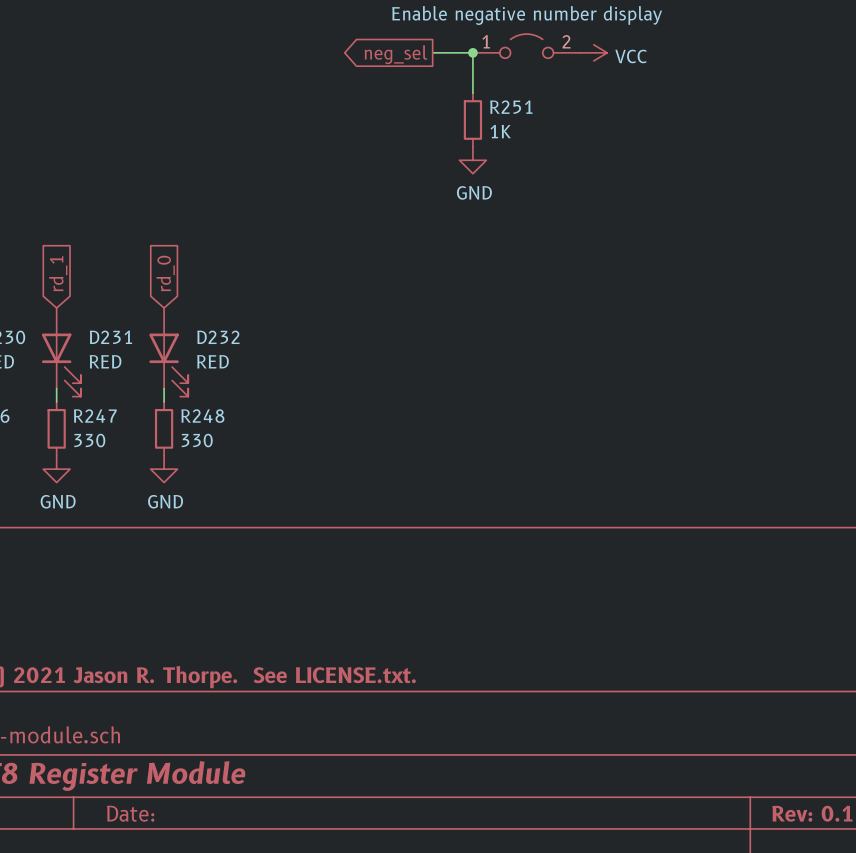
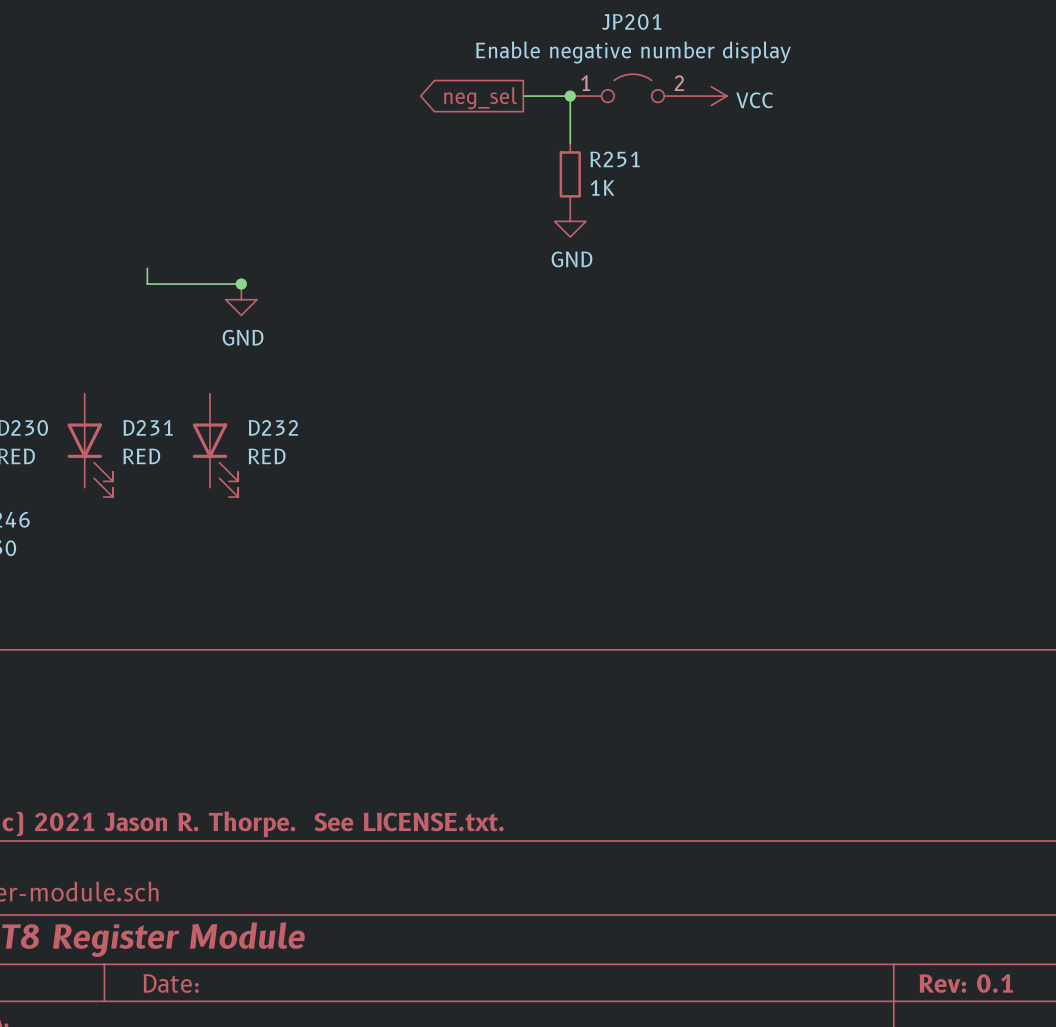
wire: none -> (147, 268) (147, 284) (241, 284)
junction: none -> (241, 284)
power symbol: none -> GND (241, 299)
global label: rd_1 (58, 273) -> none
global label: rd_0 (165, 273) -> none
wire: (56, 388) (56, 402) -> none
wire: (164, 388) (164, 402) -> none
R247: 330 (56, 428) -> none
R248: 330 (164, 428) -> none
power symbol: GND (56, 469) -> none
power symbol: GND (164, 469) -> none

